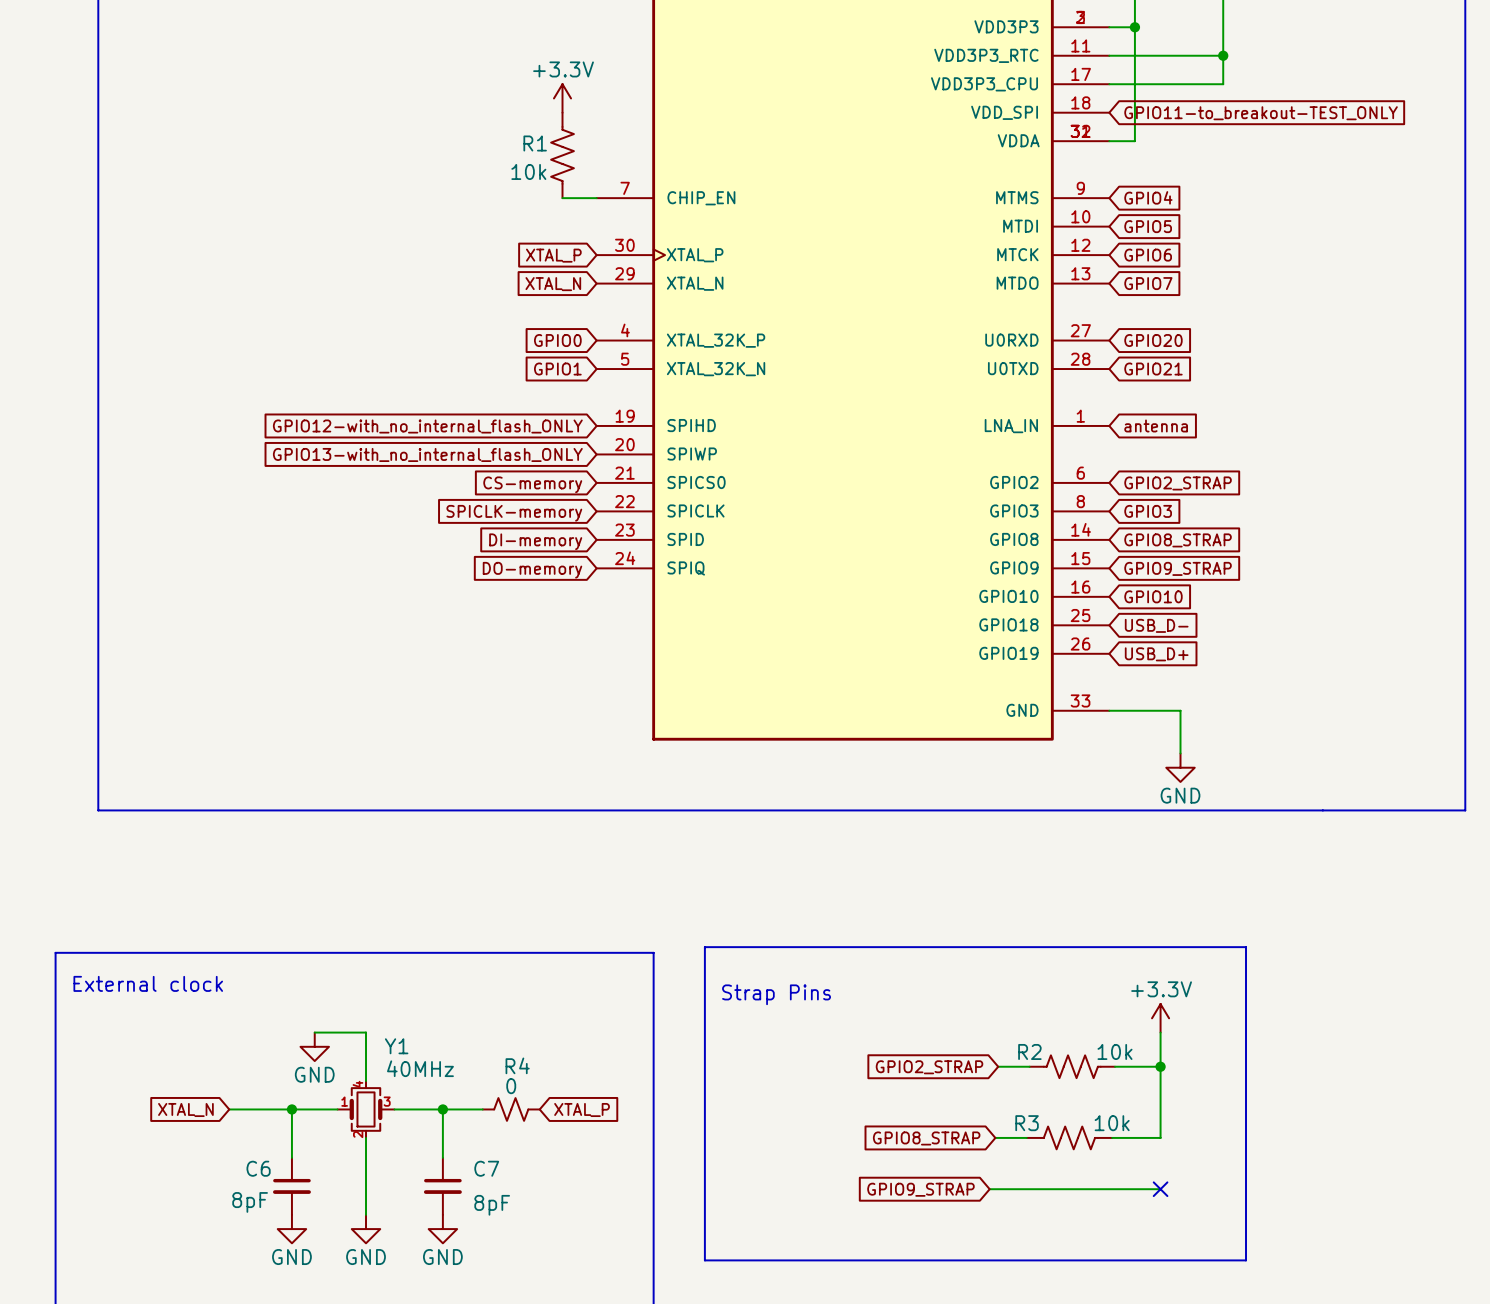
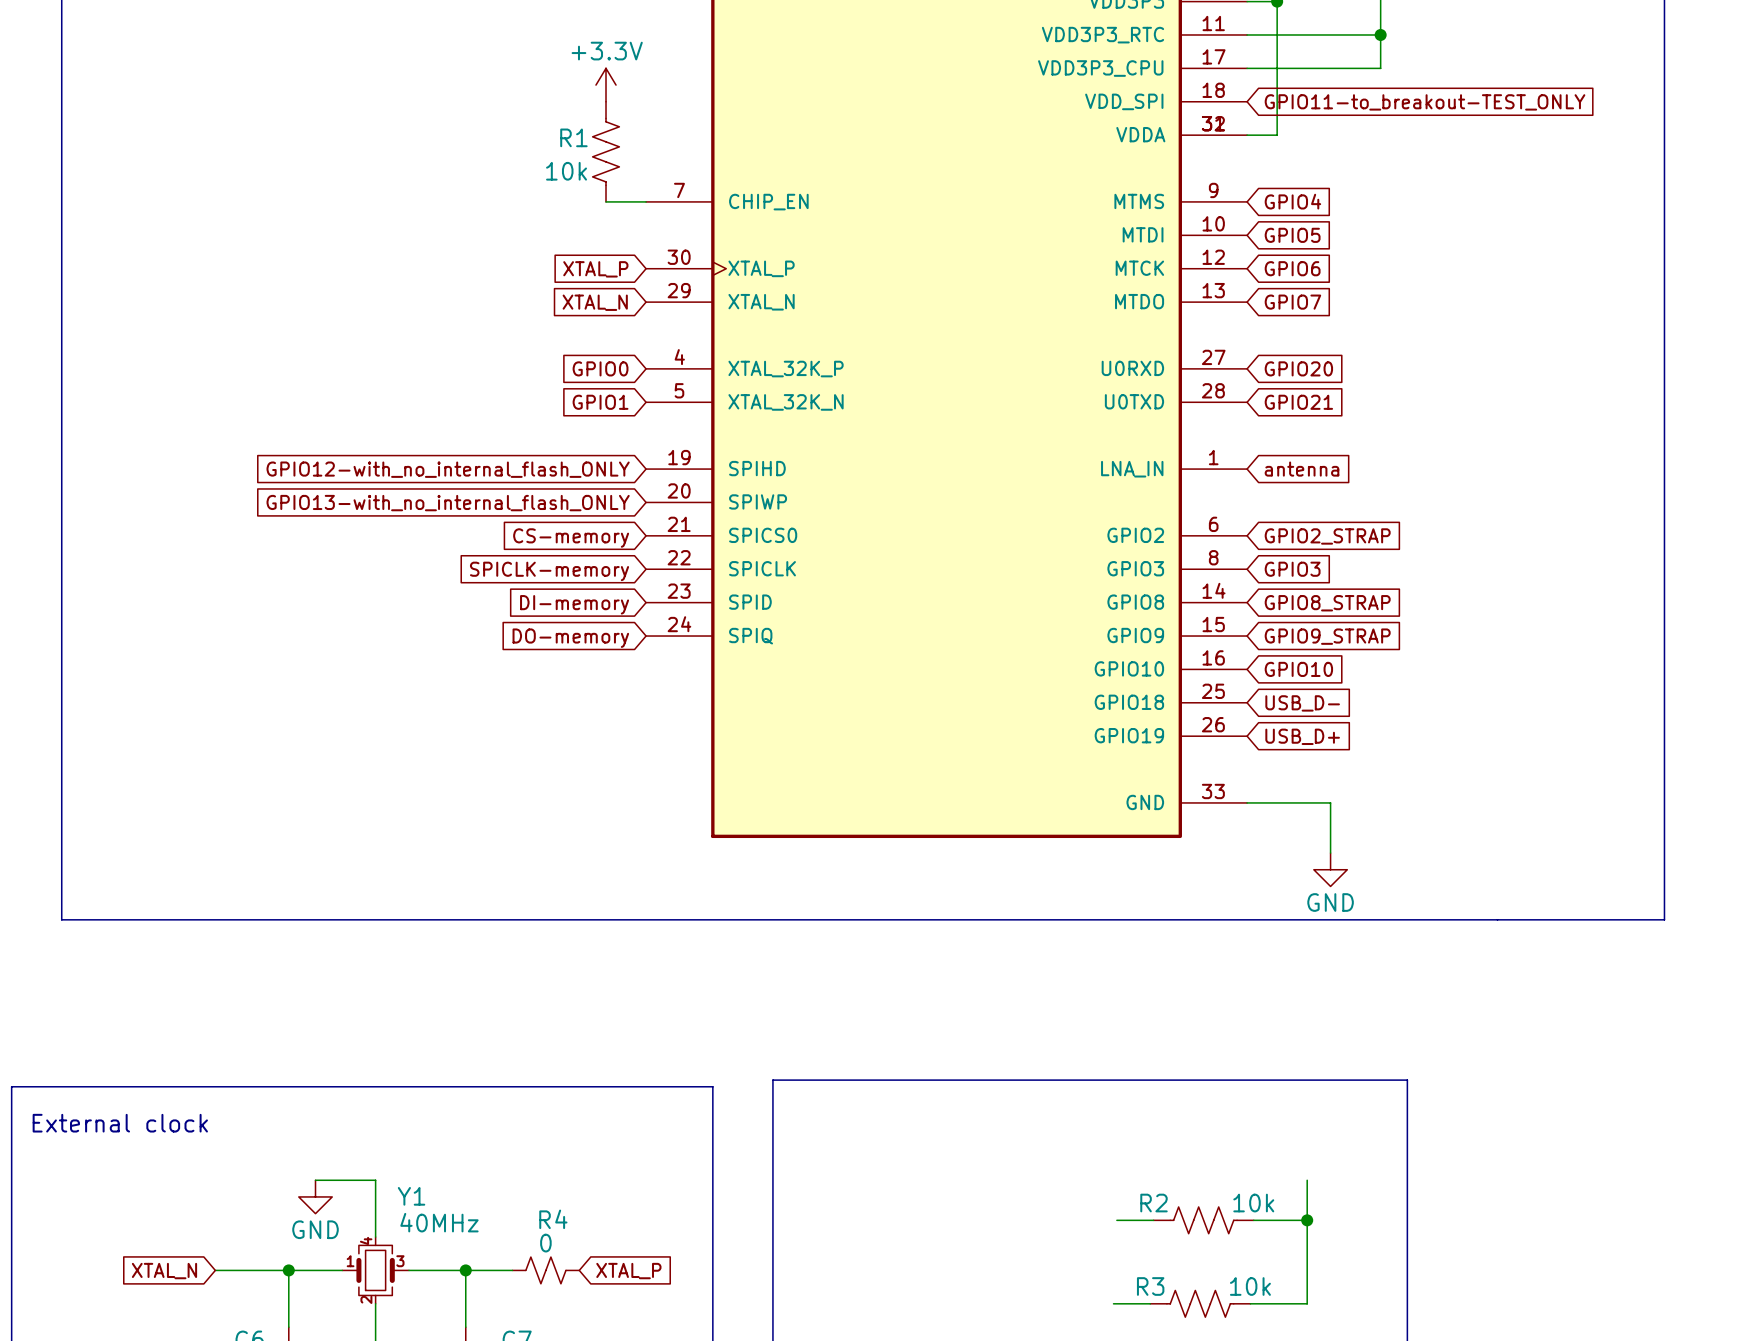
text: Strap Pins (776, 994) -> none
power symbol: +3.3V (1160, 1018) -> none
global label: GPIO2_STRAP (929, 1067) -> none
global label: GPIO8_STRAP (926, 1138) -> none

